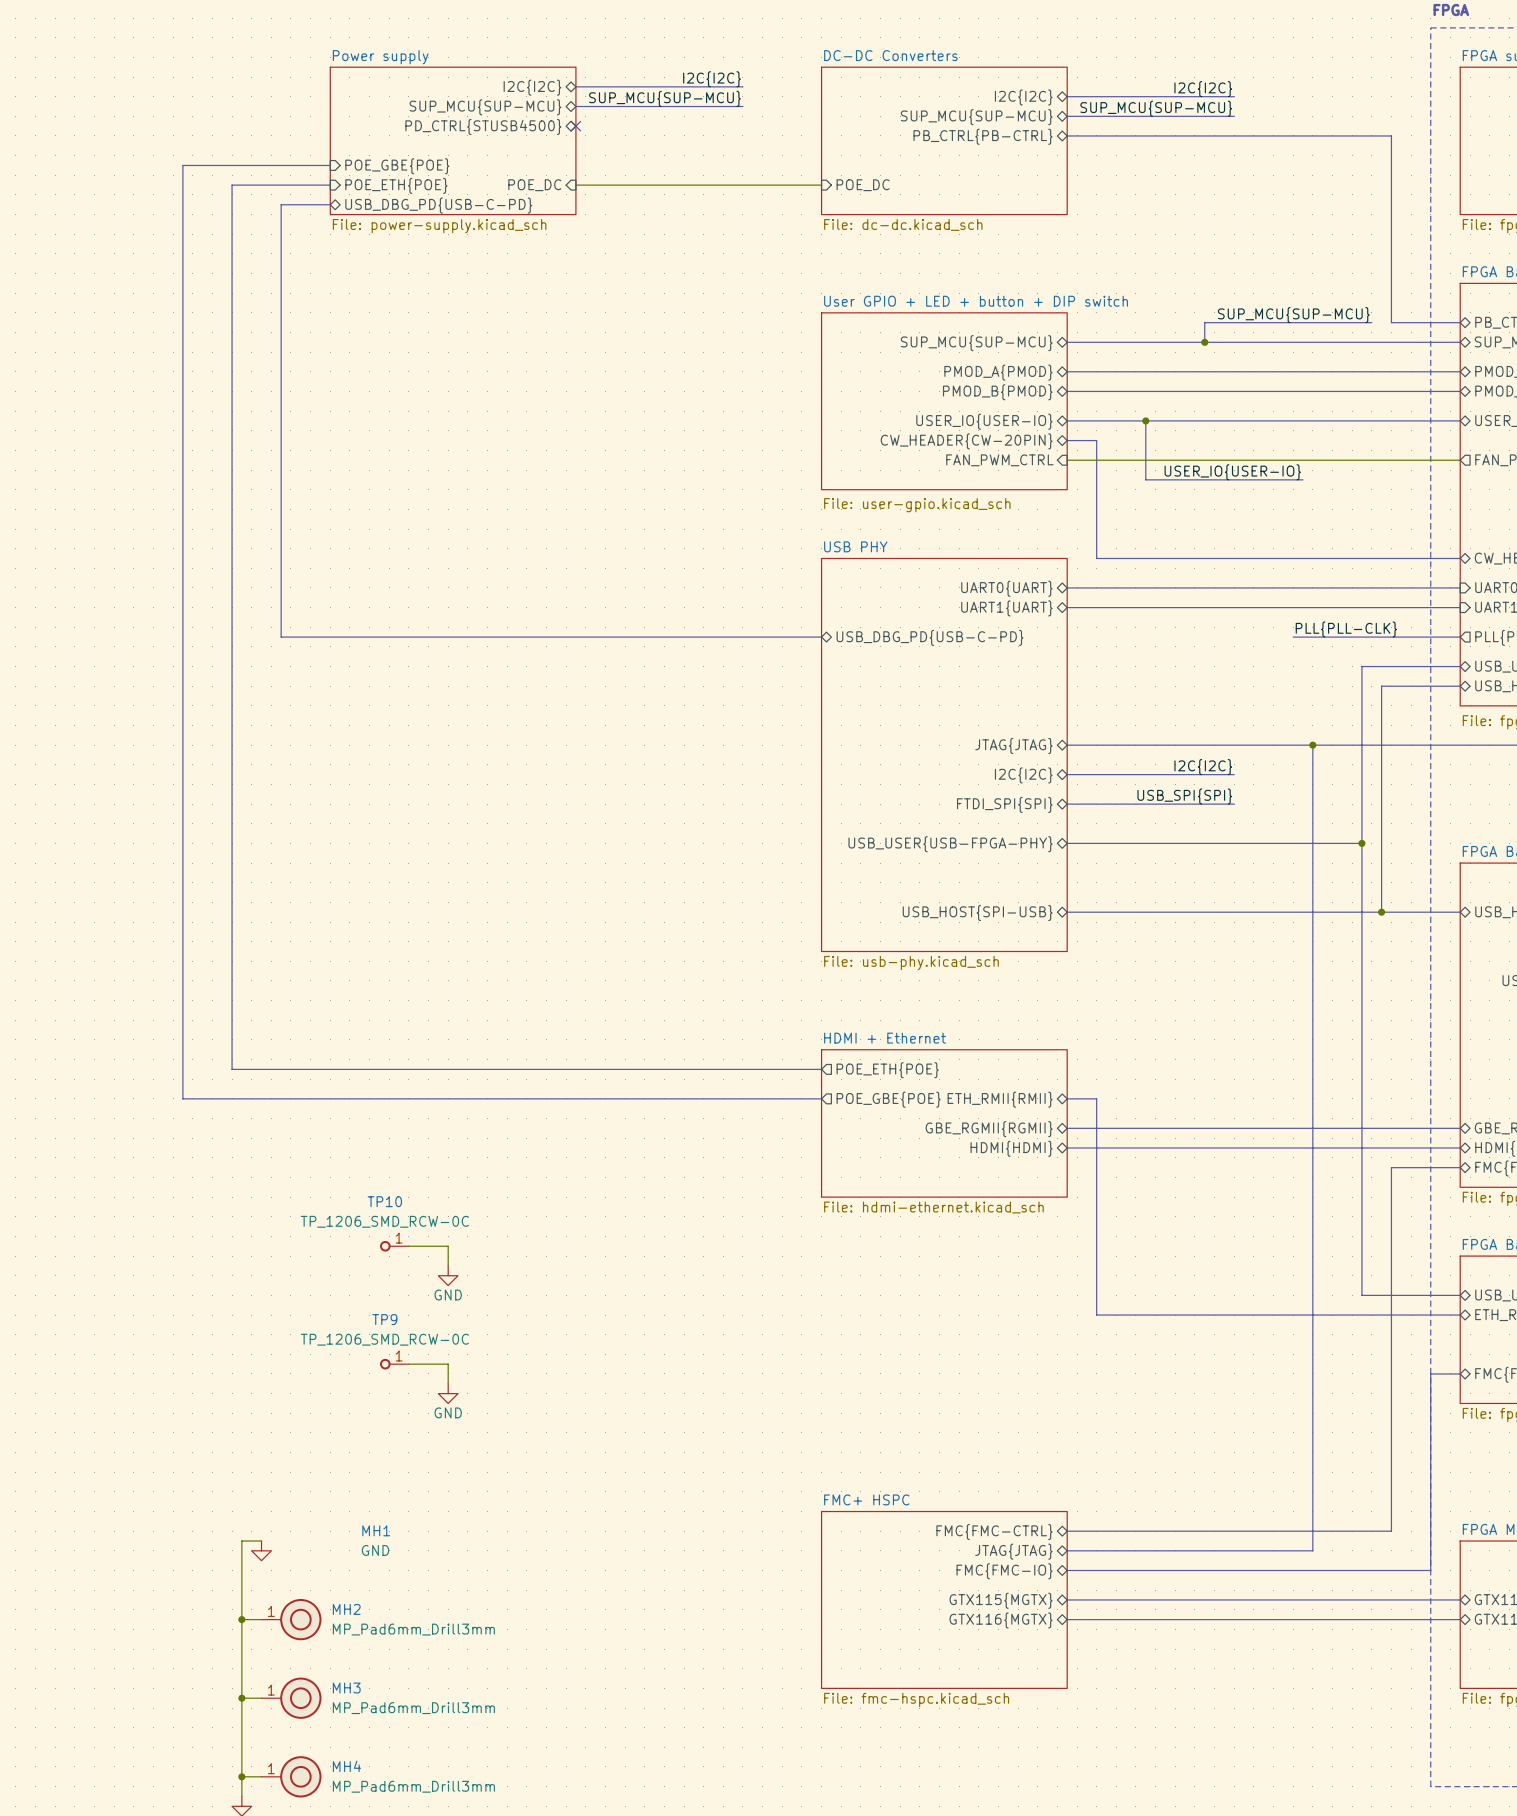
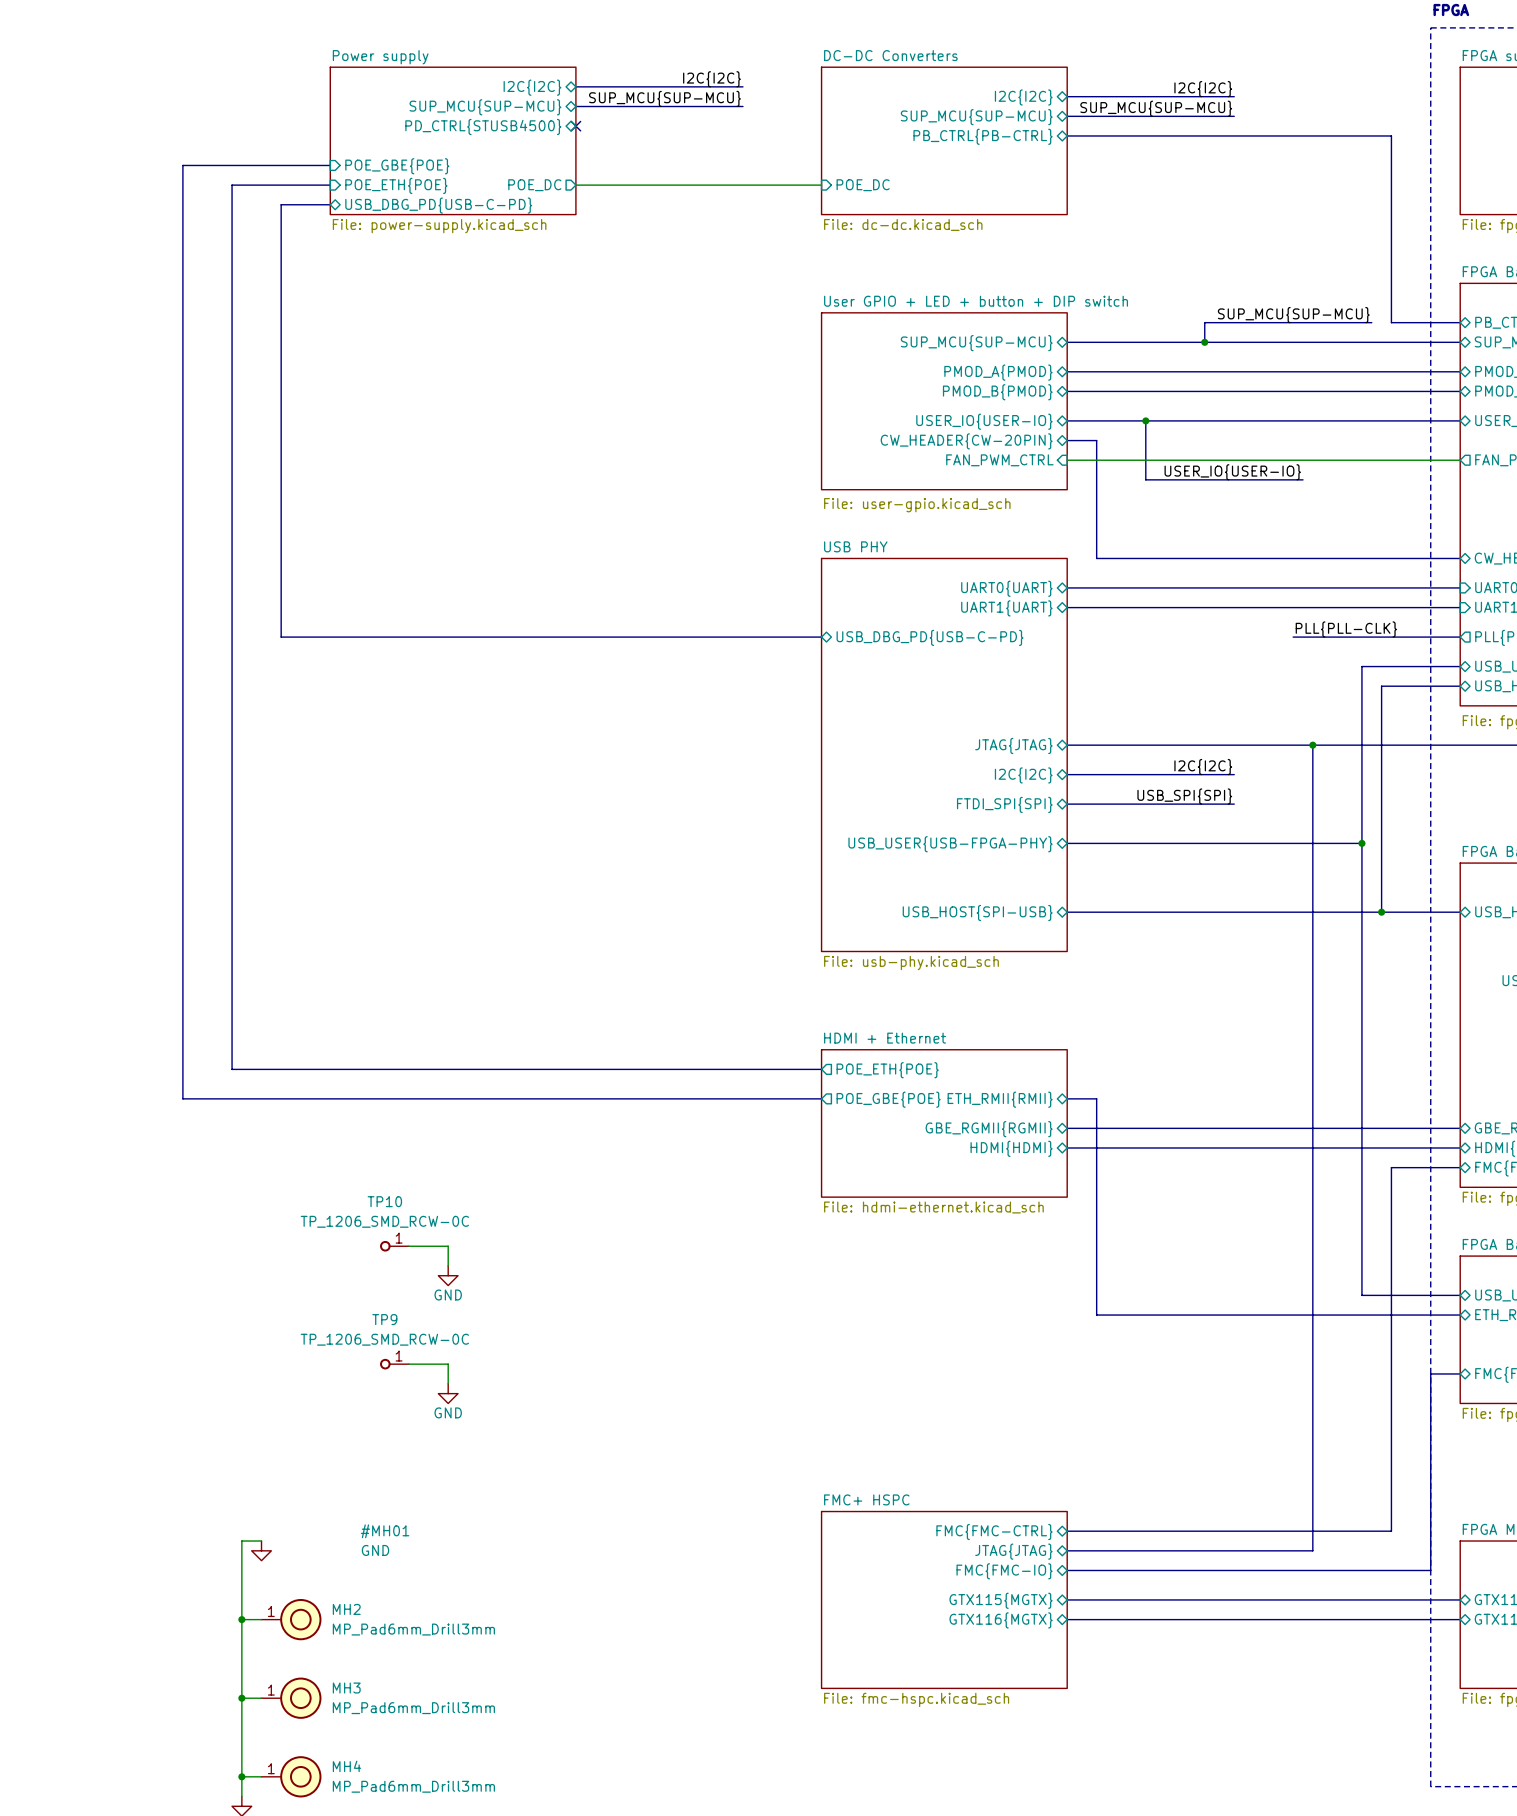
sheet pin shape: input (534, 185) -> output (534, 185)
MH1 name: MH1 (376, 1530) -> #MH01 (385, 1531)

